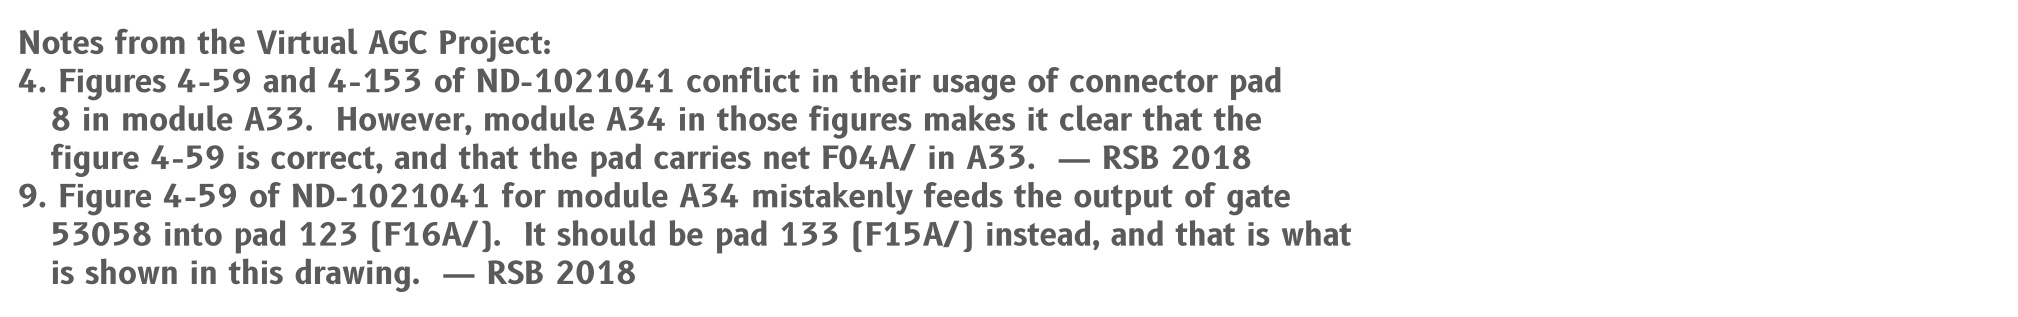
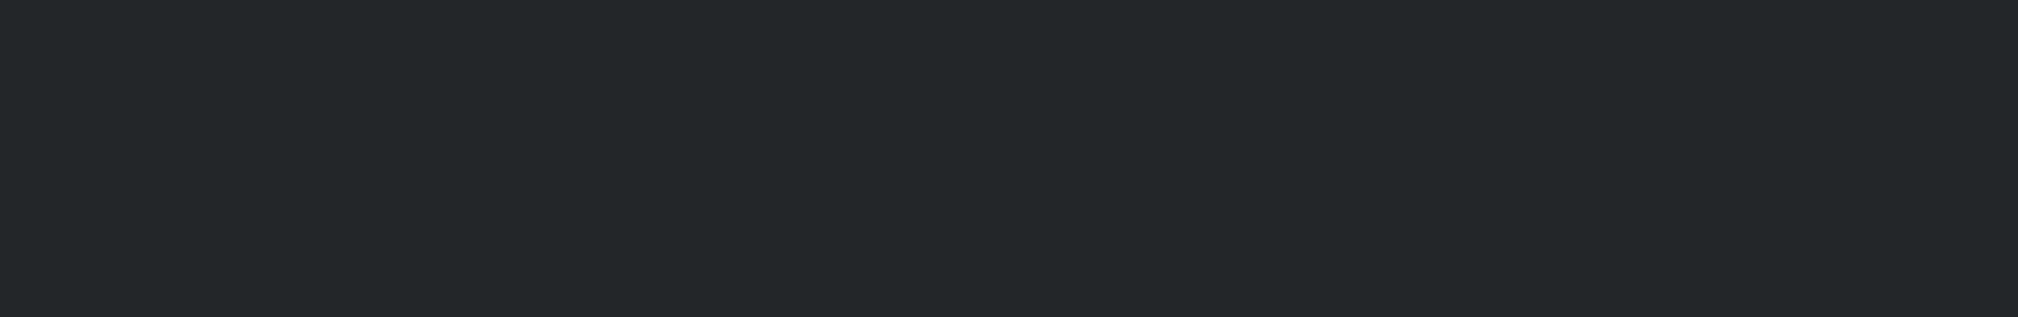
text: Notes from the Virtual AGC Project: (284, 45) -> none
text: 4. Figures 4-59 and 4-153 of ND-1021041 conflict in their usage of connector pad (649, 83) -> none
text: 8 in module A33. However, module A34 in those figures makes it clear that the (656, 121) -> none
text: figure 4-59 is correct, and that the pad carries net F04A/ in A33. — RSB 2018 (650, 160) -> none
text: 9. Figure 4-59 of ND-1021041 for module A34 mistakenly feeds the output of gate (654, 198) -> none
text: 53058 into pad 123 (F16A/). It should be pad 133 (F15A/) instead, and that is what (702, 236) -> none
text: is shown in this drawing. — RSB 2018 (343, 275) -> none

